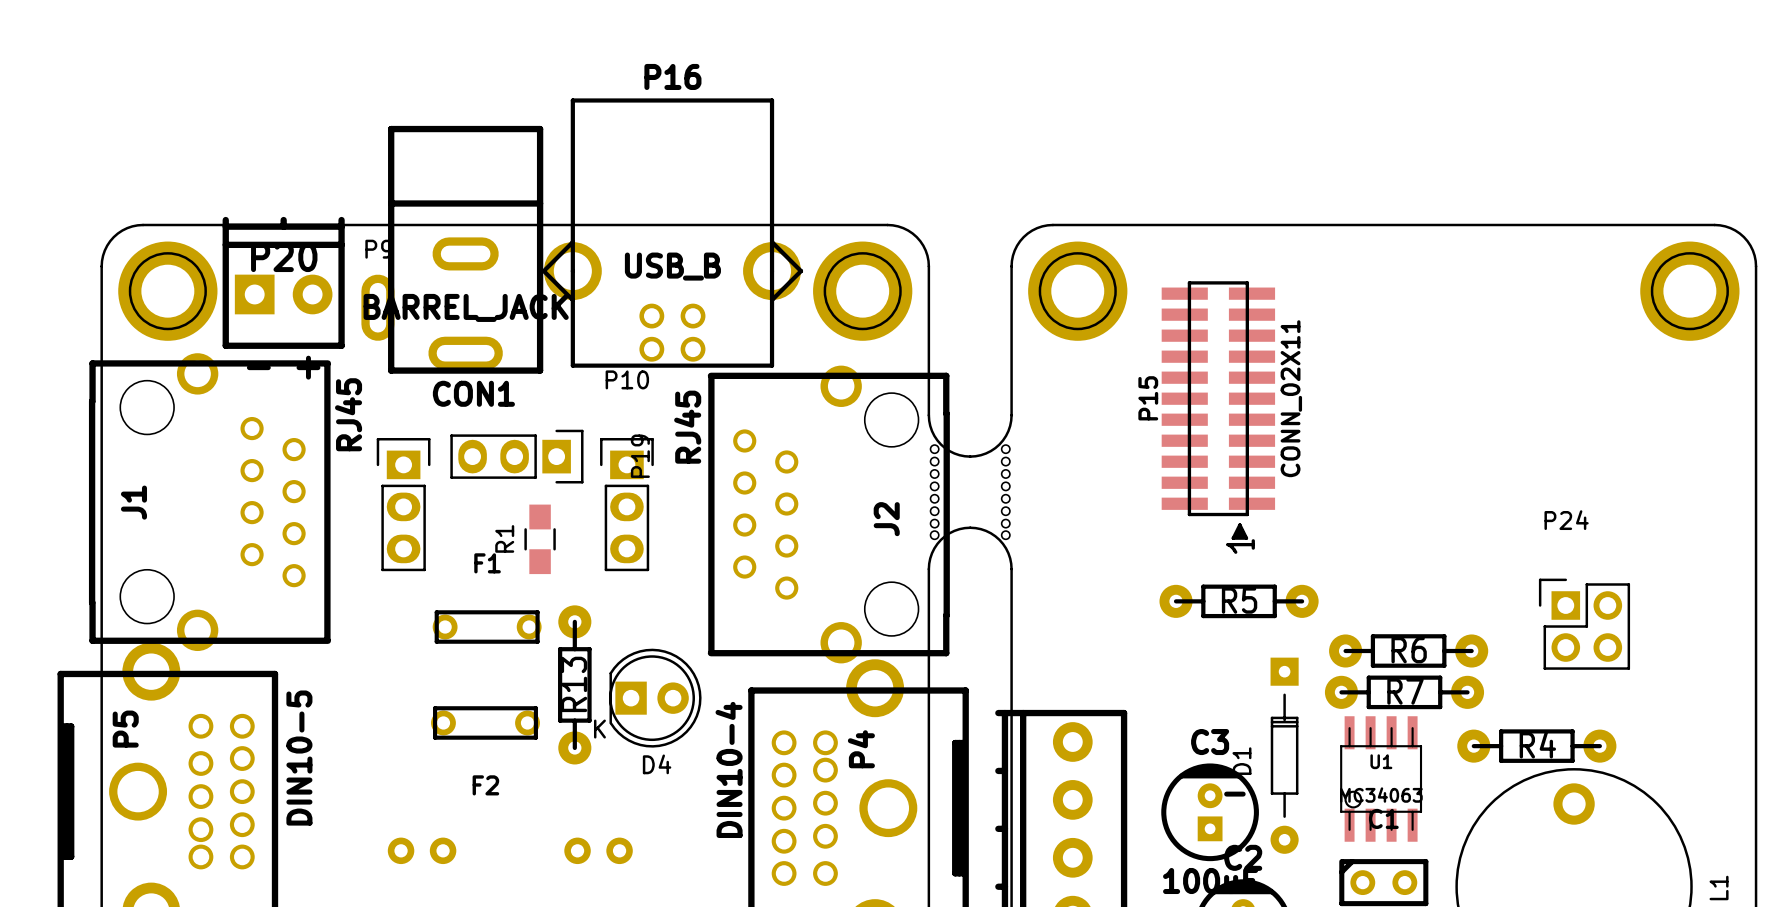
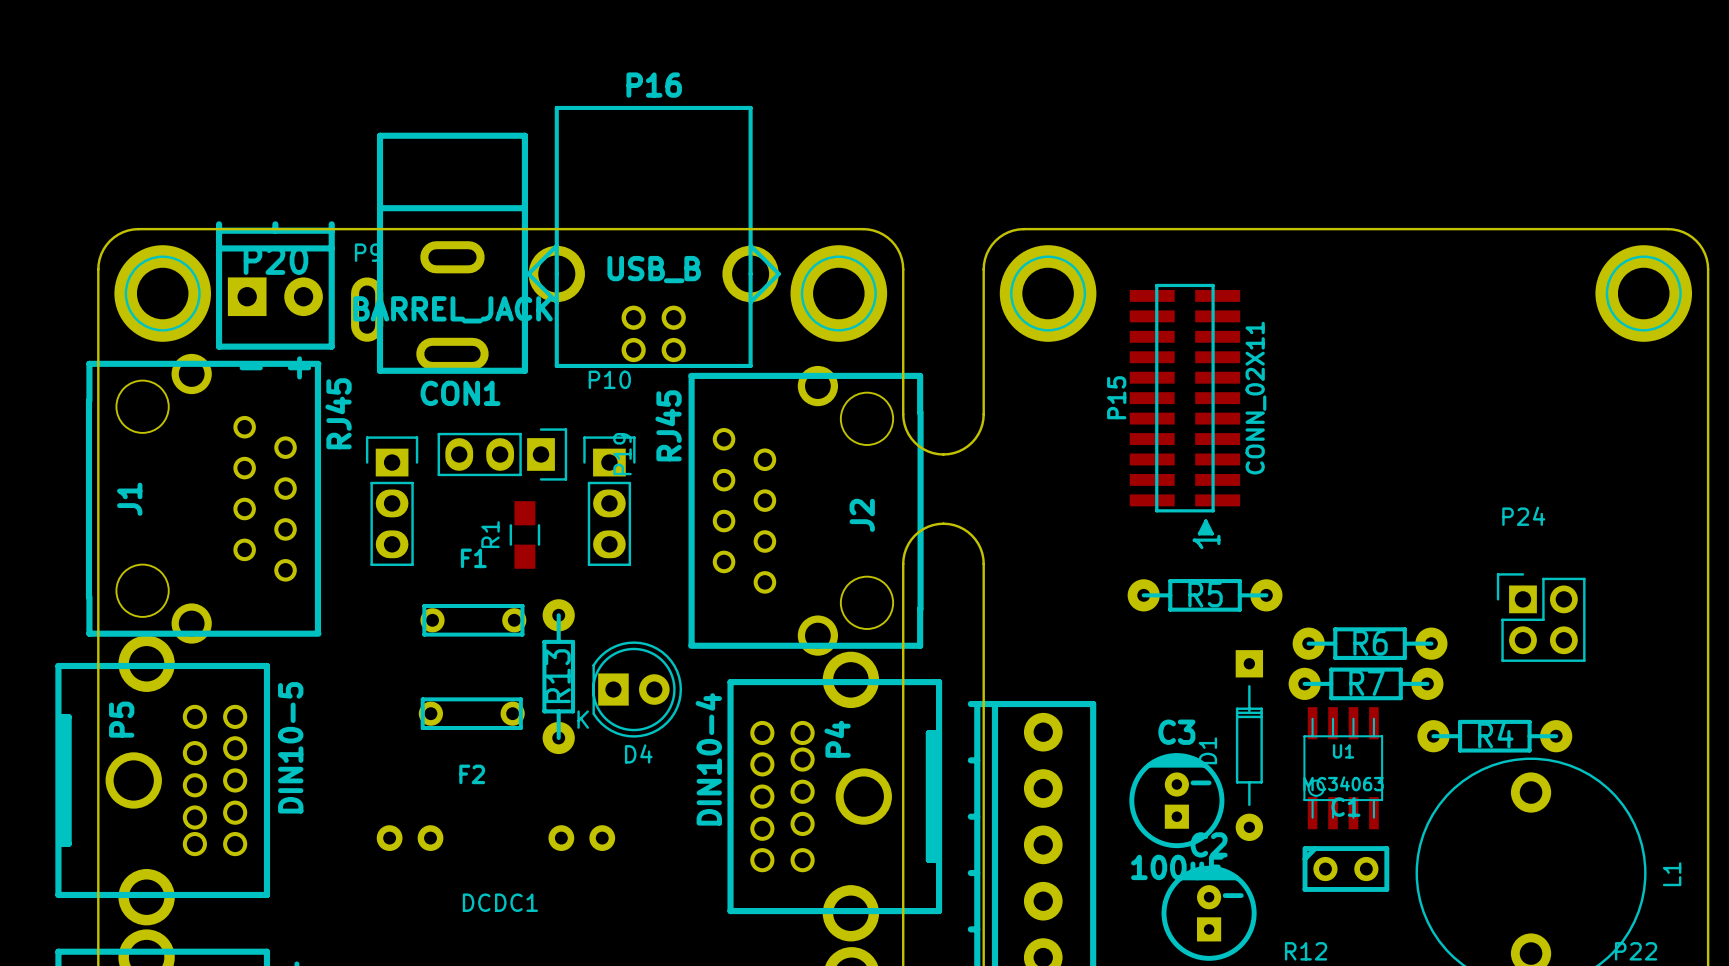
part: (934, 492) -> none
part: (1005, 492) -> none

